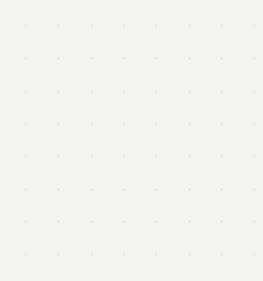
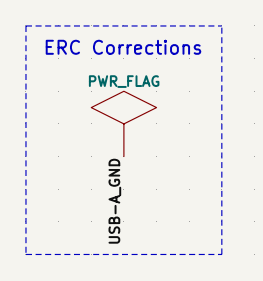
line: none -> (25, 25) (221, 25) (221, 254) (25, 254) (25, 25)
text: none -> ERC Corrections (123, 47)
power symbol: none -> PWR_FLAG (123, 123)
label: none -> USB-A_GND (114, 201)

